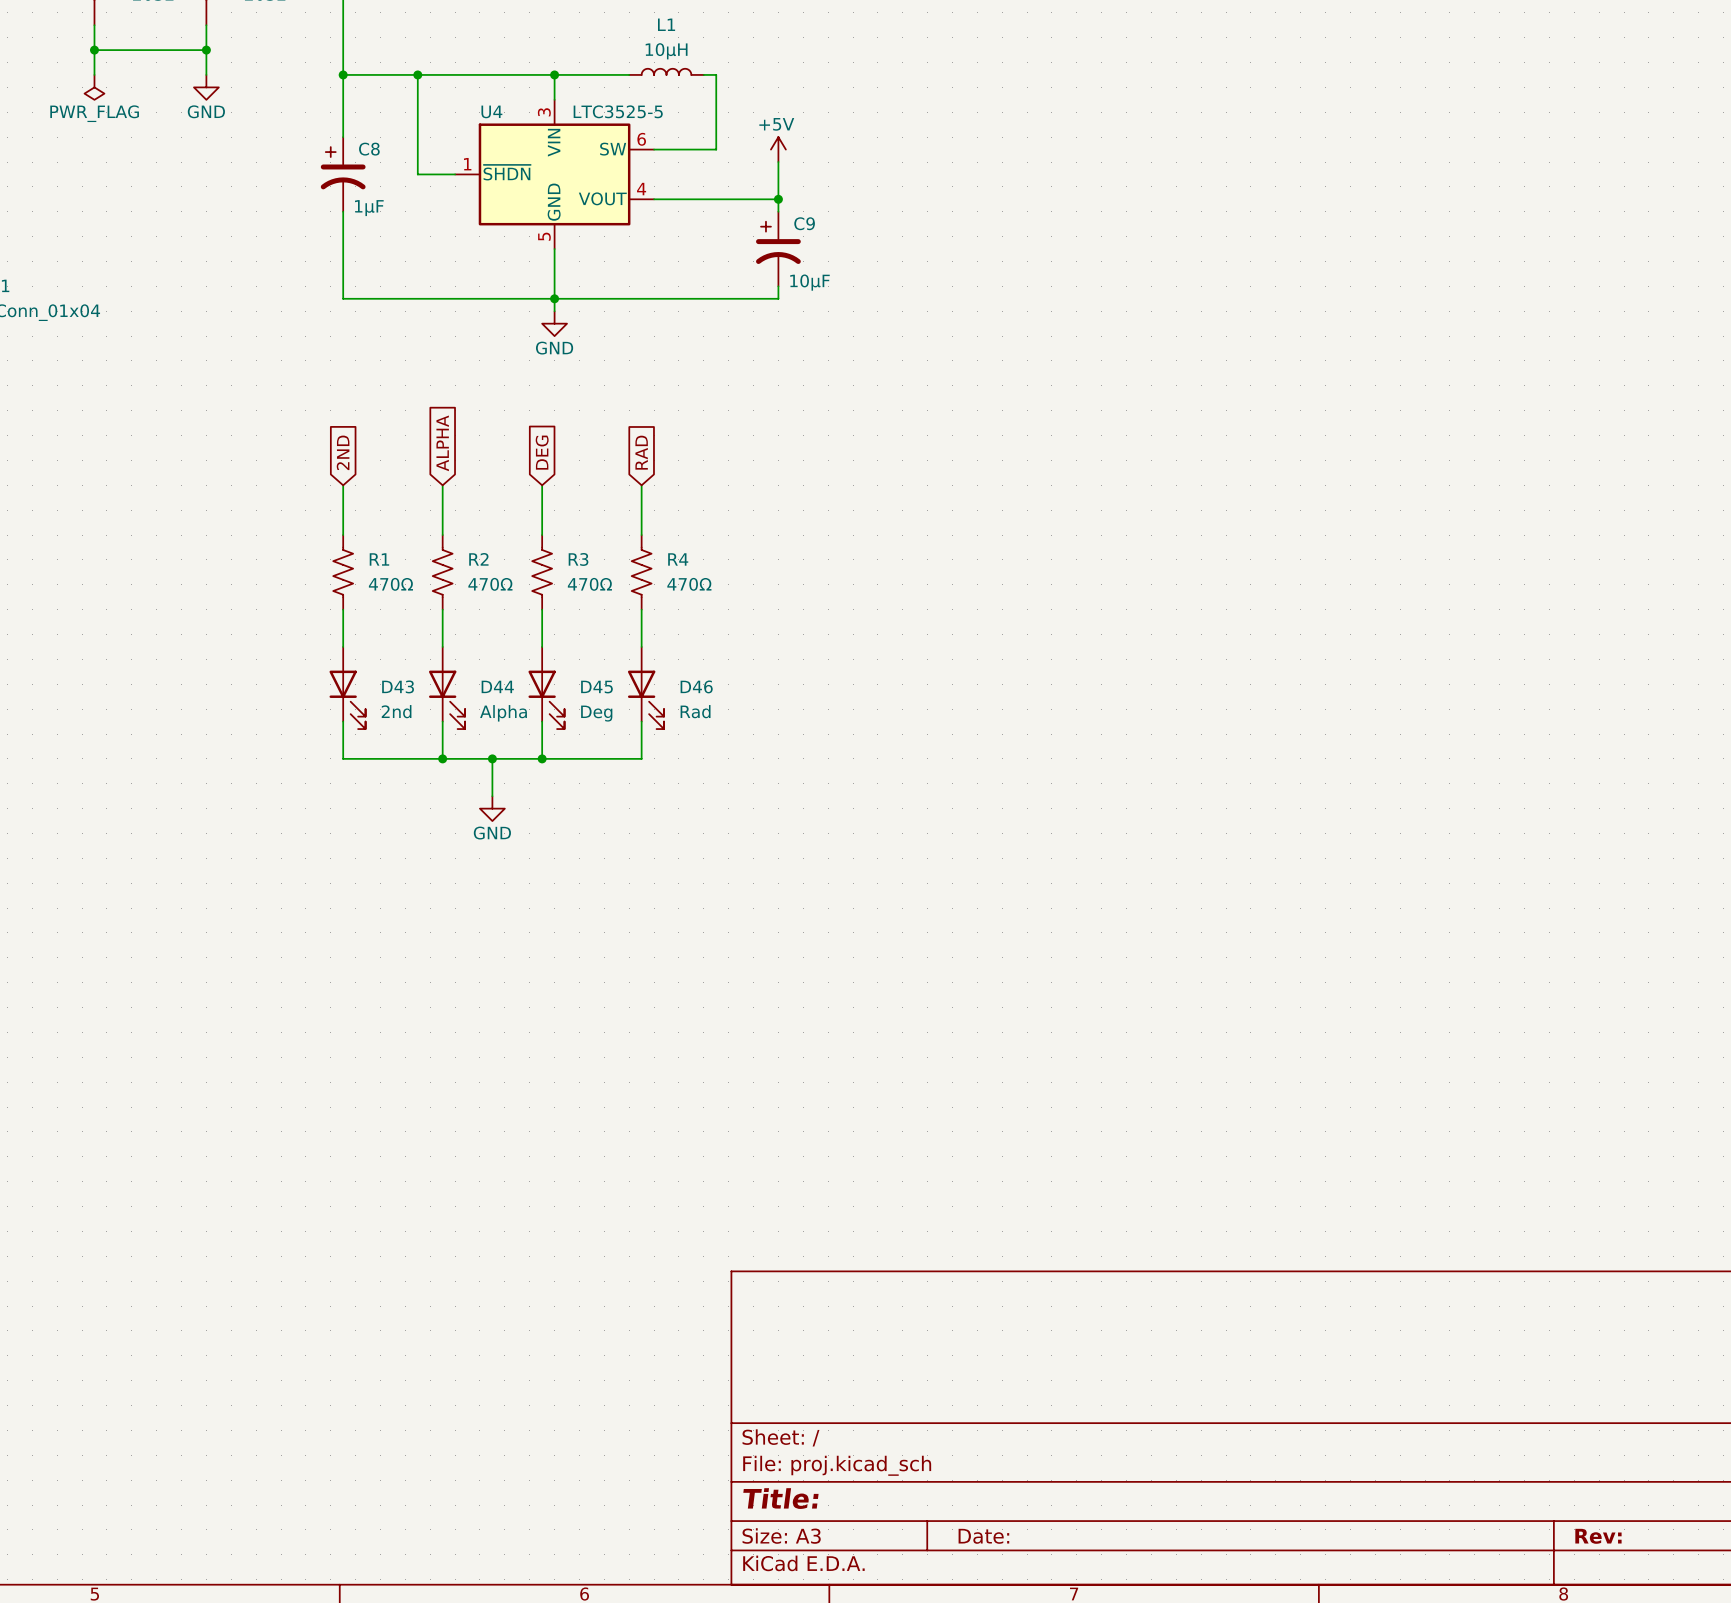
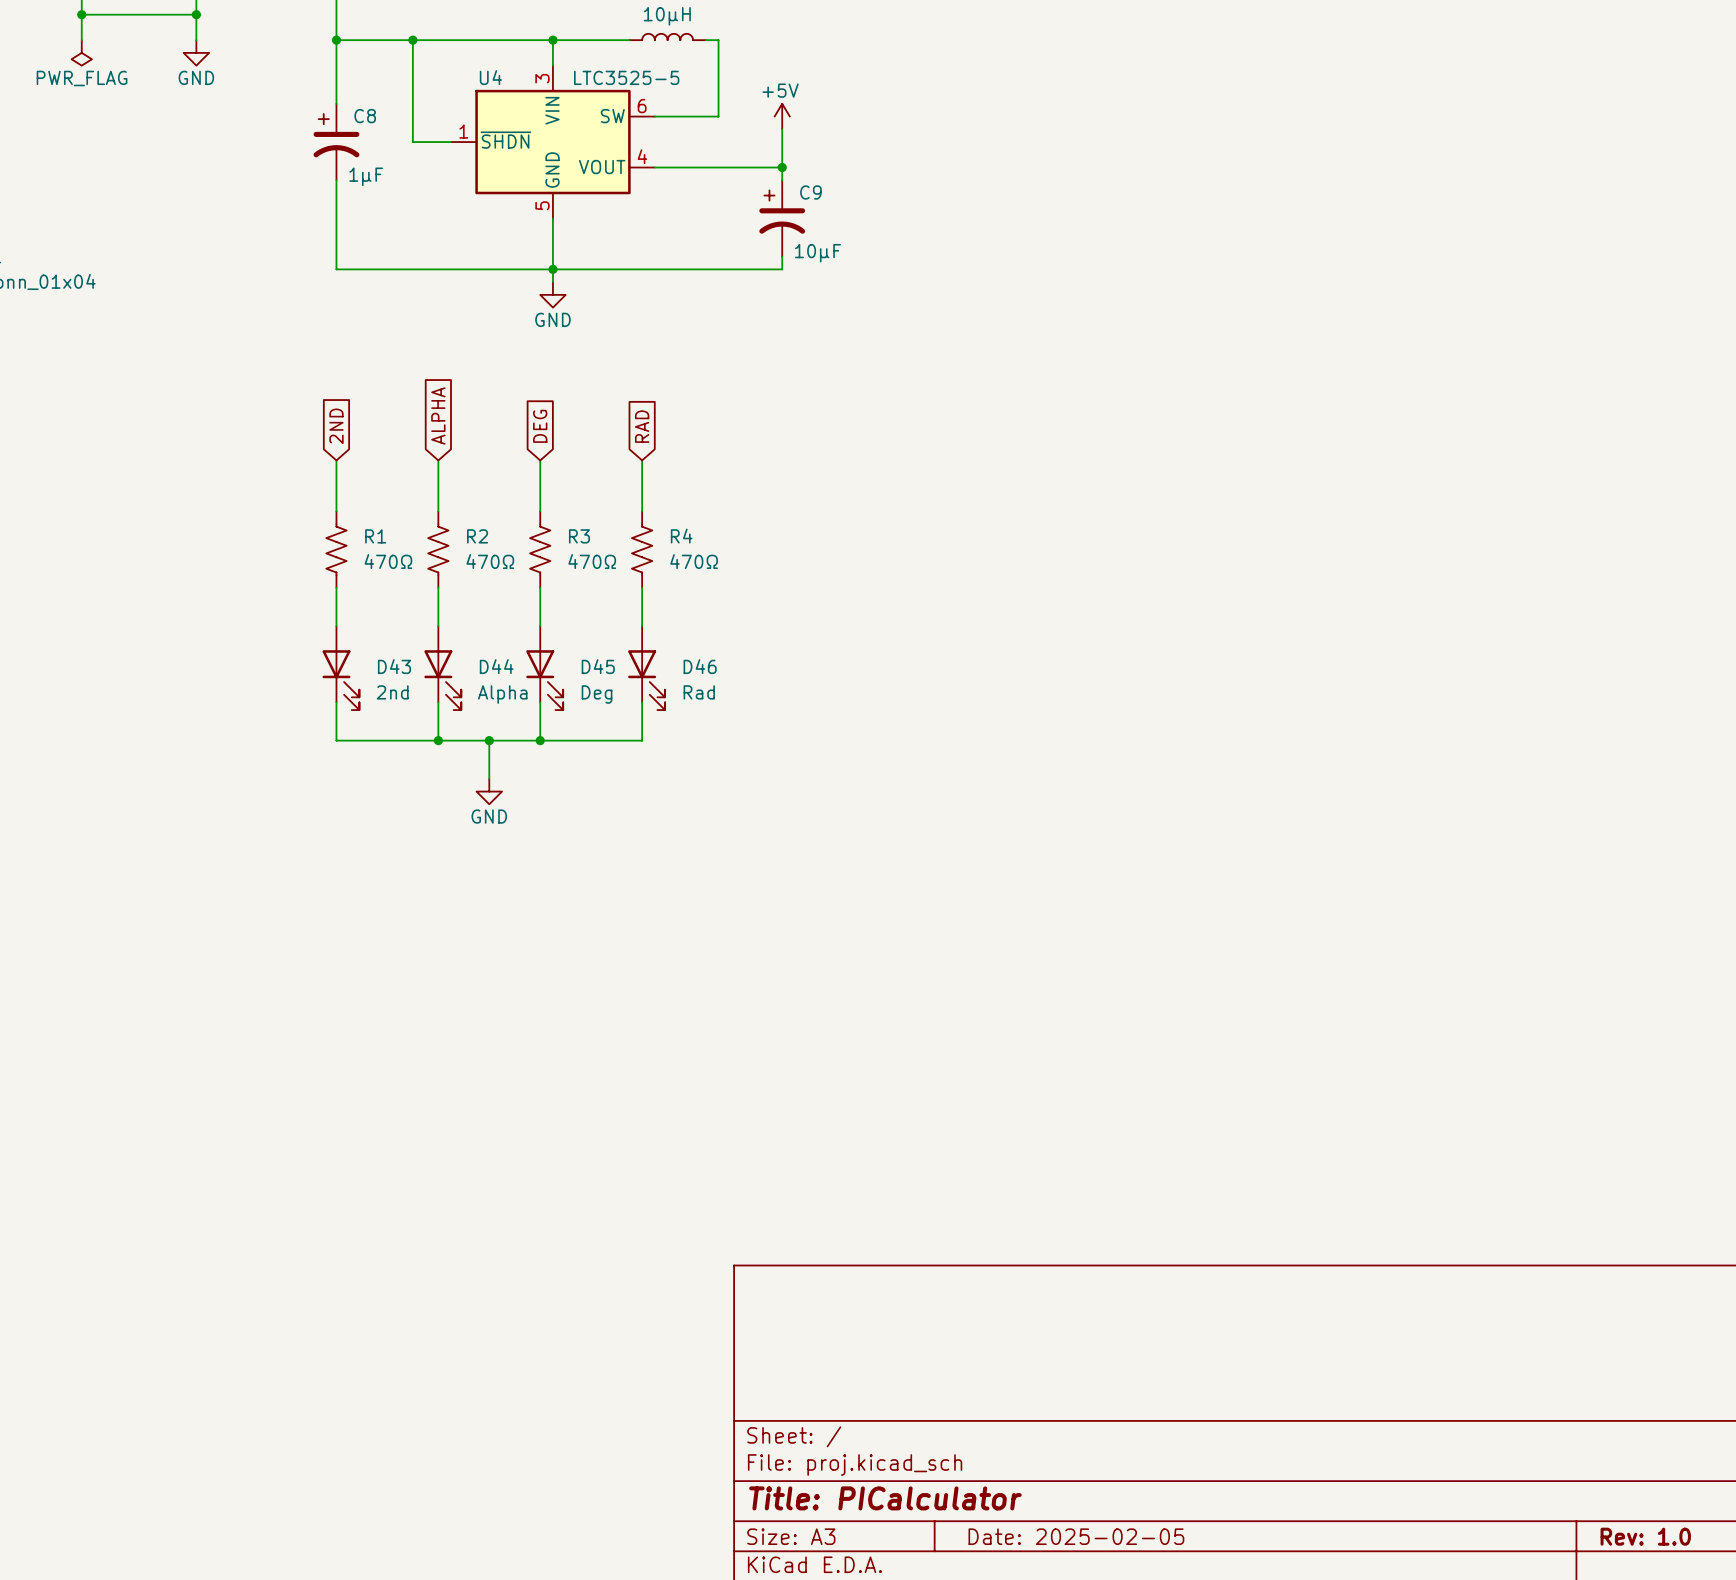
title block: Title: (780, 1498) -> Title: PICalculator (885, 1498)
title block: Date: (983, 1536) -> Date: 2025-02-05 (1076, 1536)
title block: Rev: (1598, 1536) -> Rev: 1.0 (1645, 1536)

